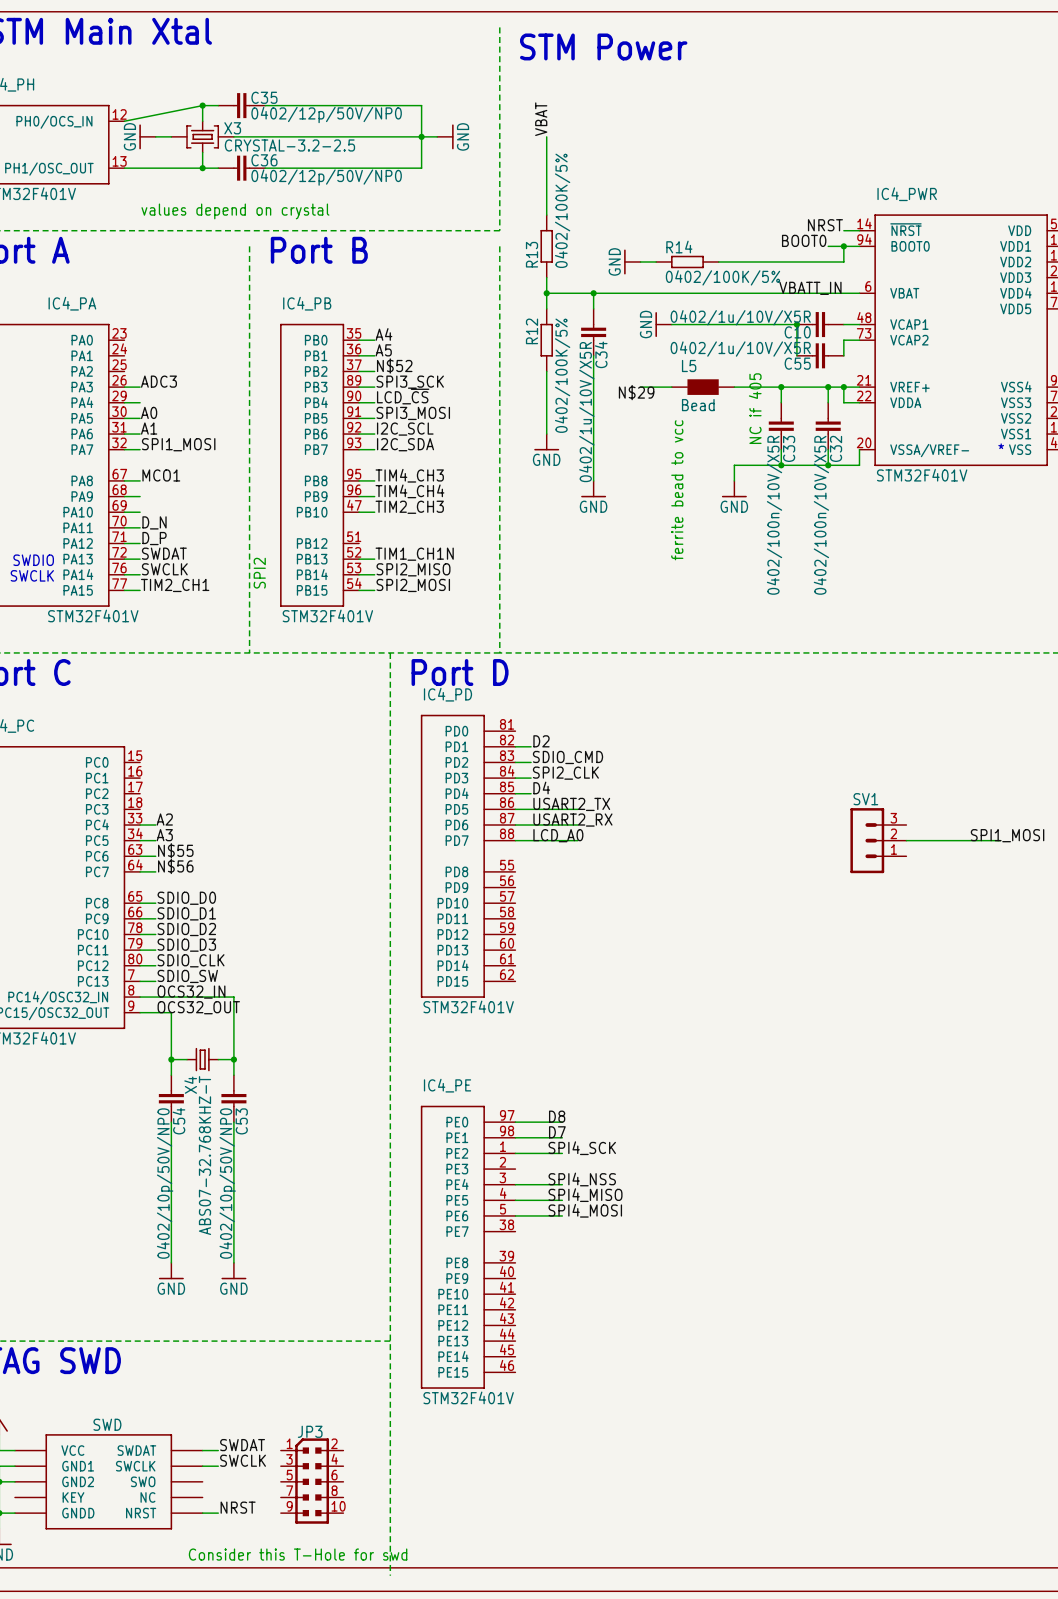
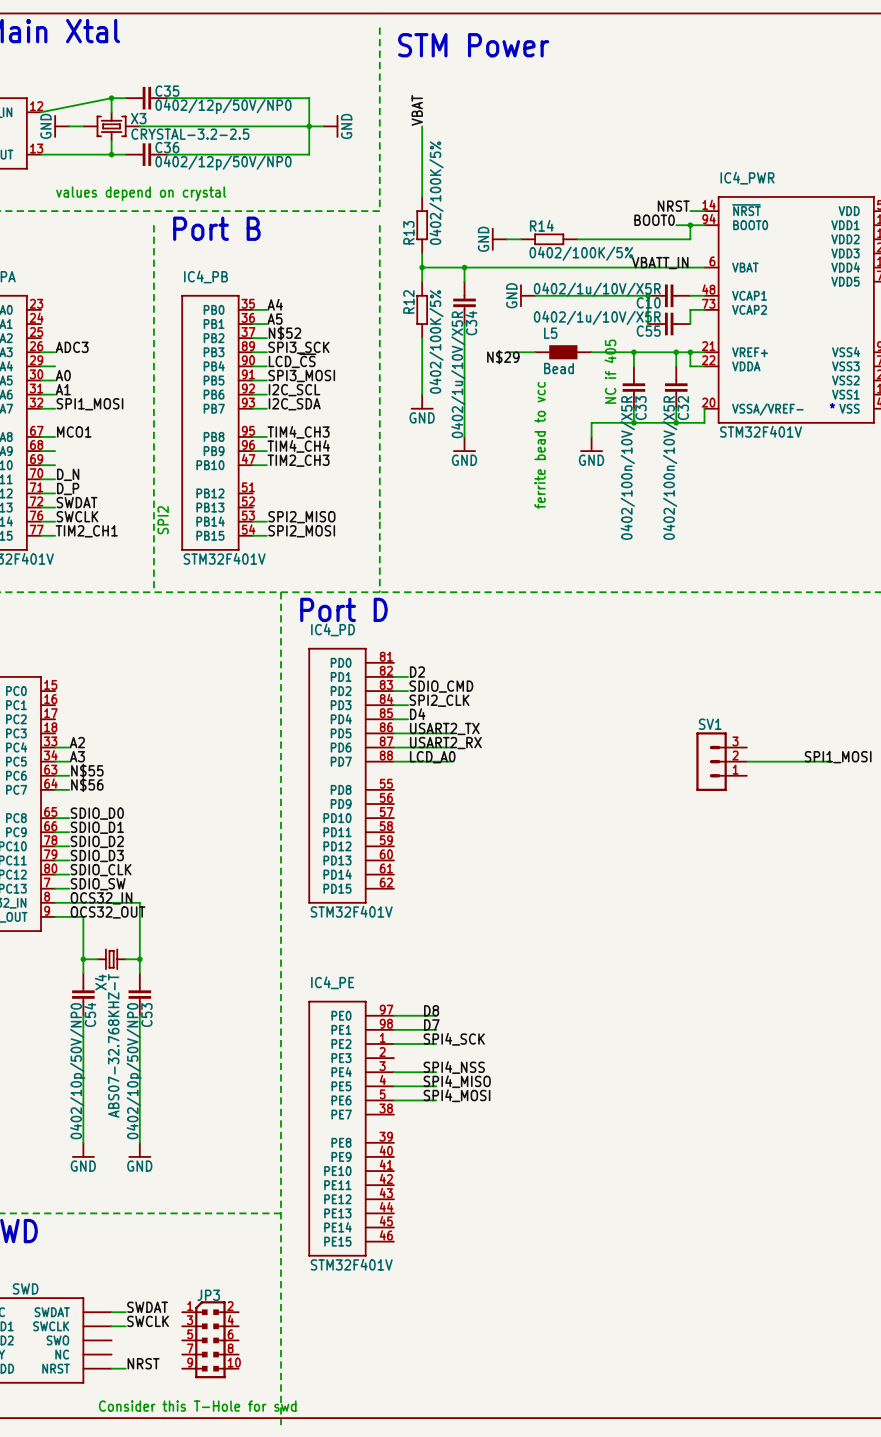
label: TIM1_CH1N (414, 554) -> none
wire: (359, 559) (374, 559) -> none

